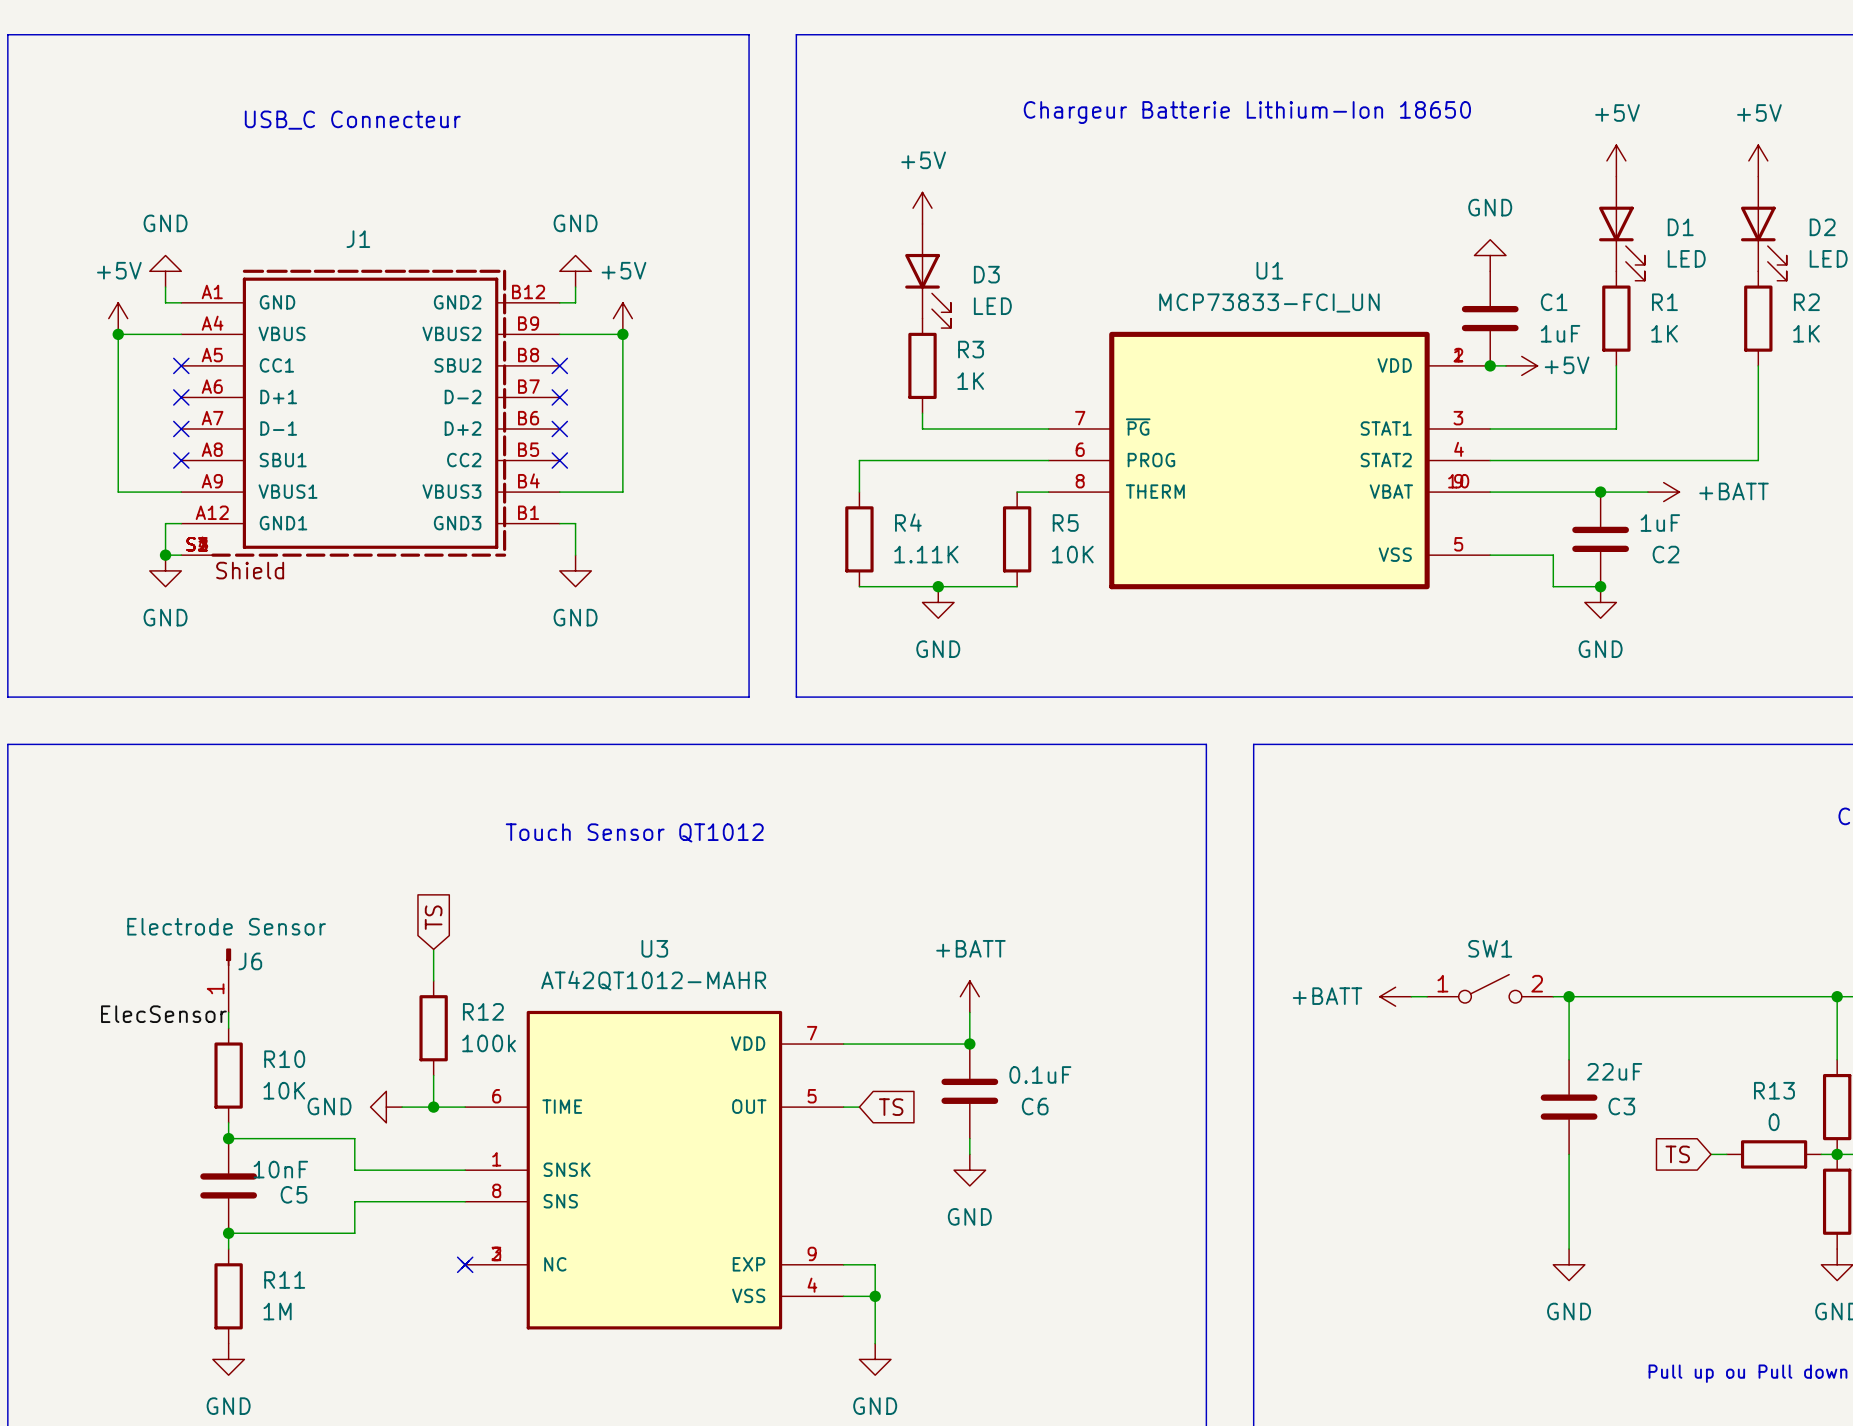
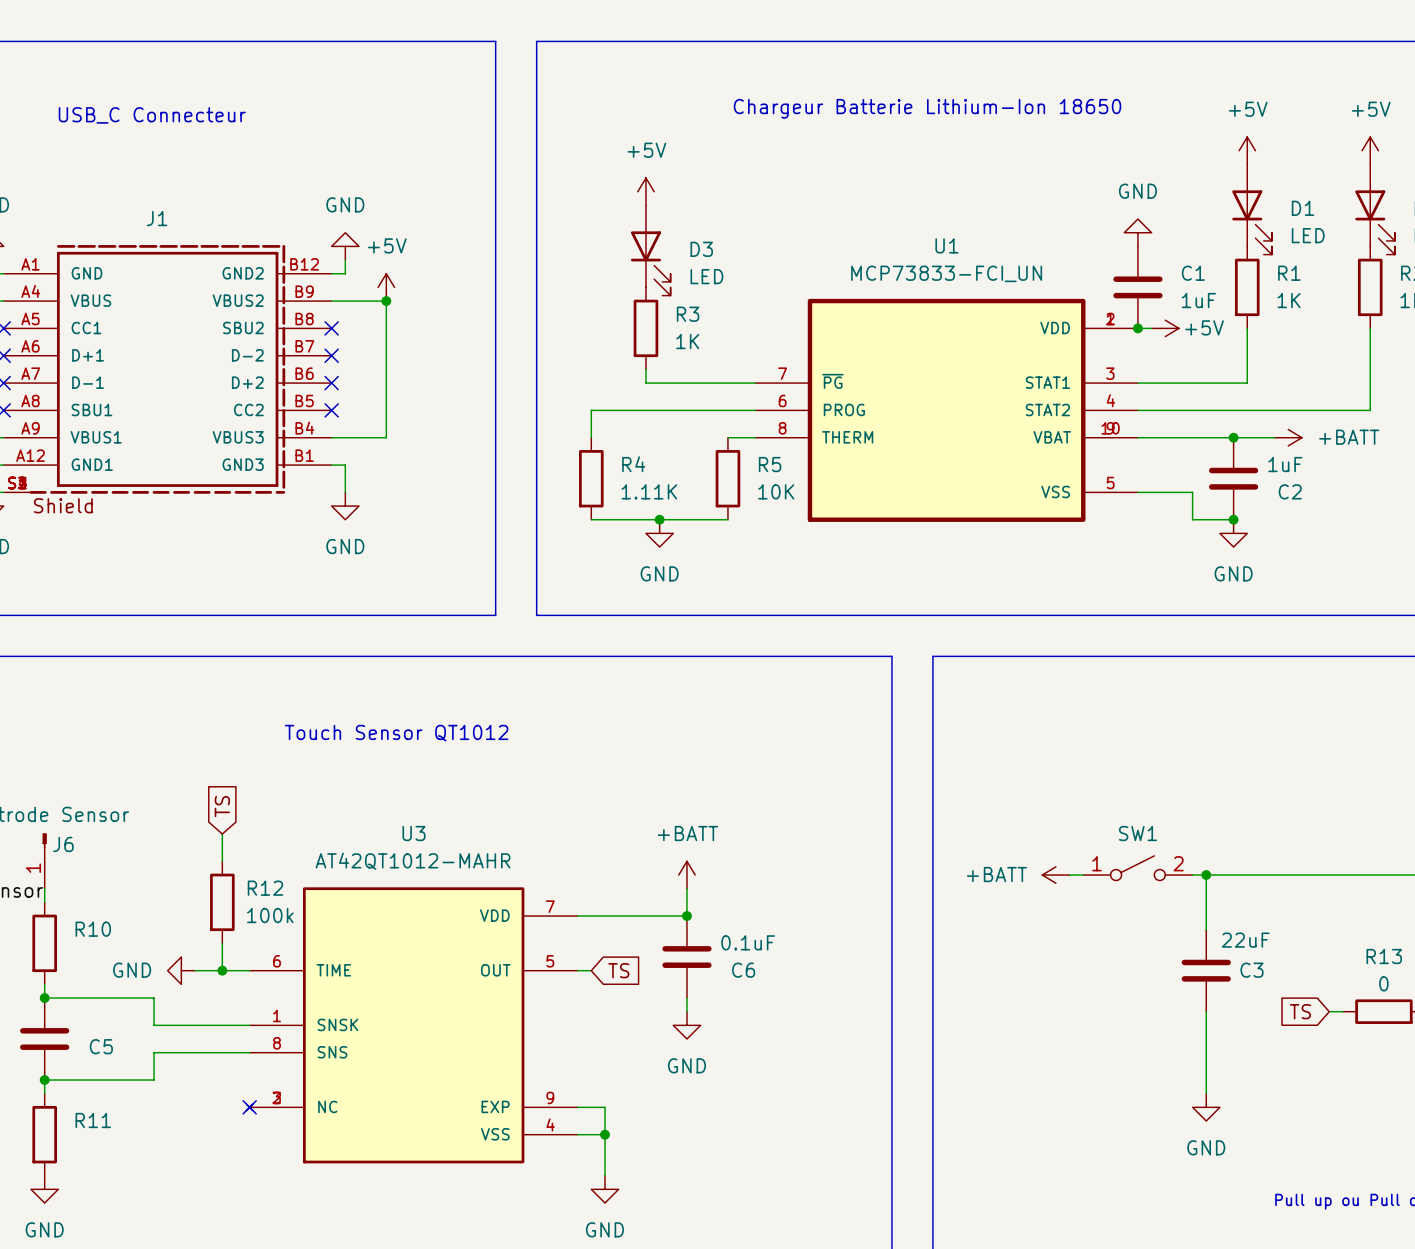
R10 value: 10K (284, 1090) -> none
C5 value: 10nF (280, 1169) -> none
R11 value: 1M (277, 1311) -> none

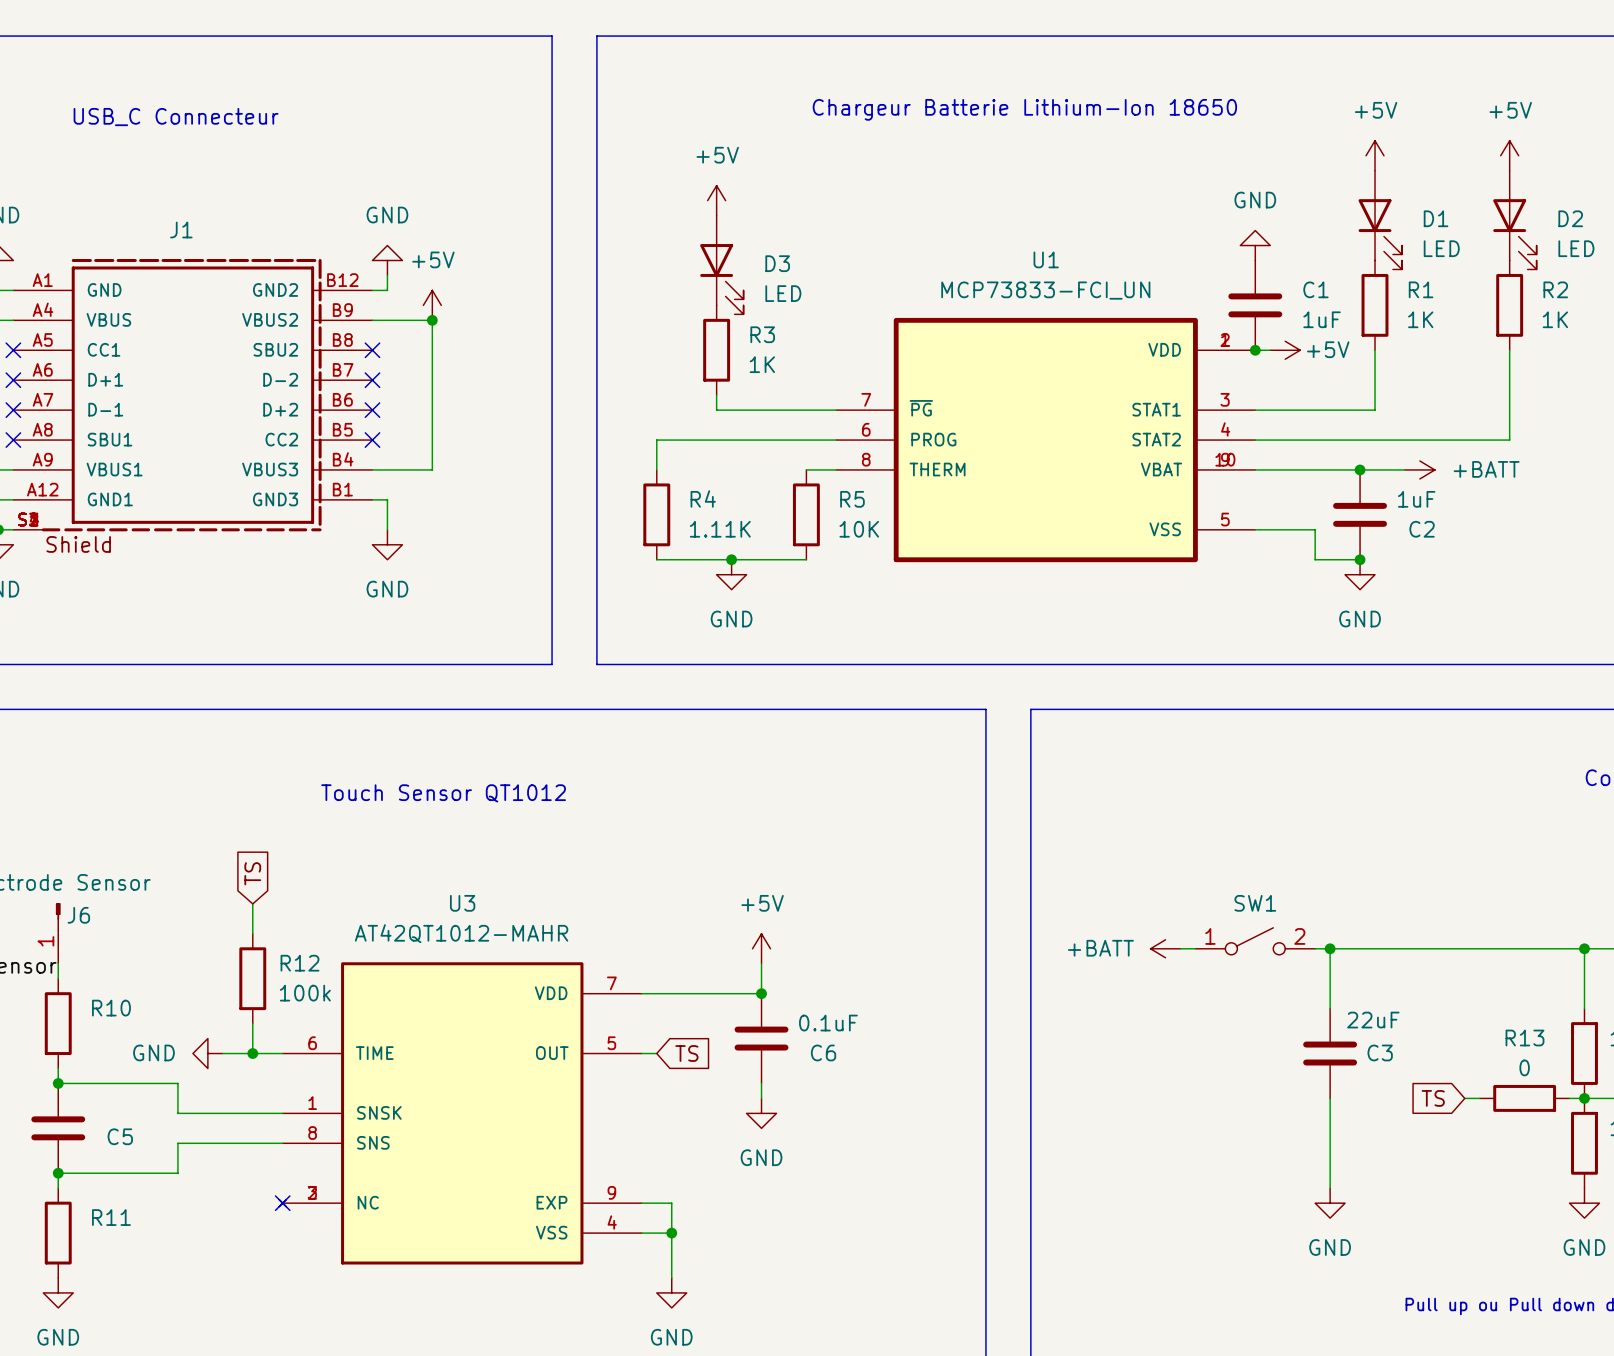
power symbol: +BATT (686, 875) -> +5V (761, 948)

